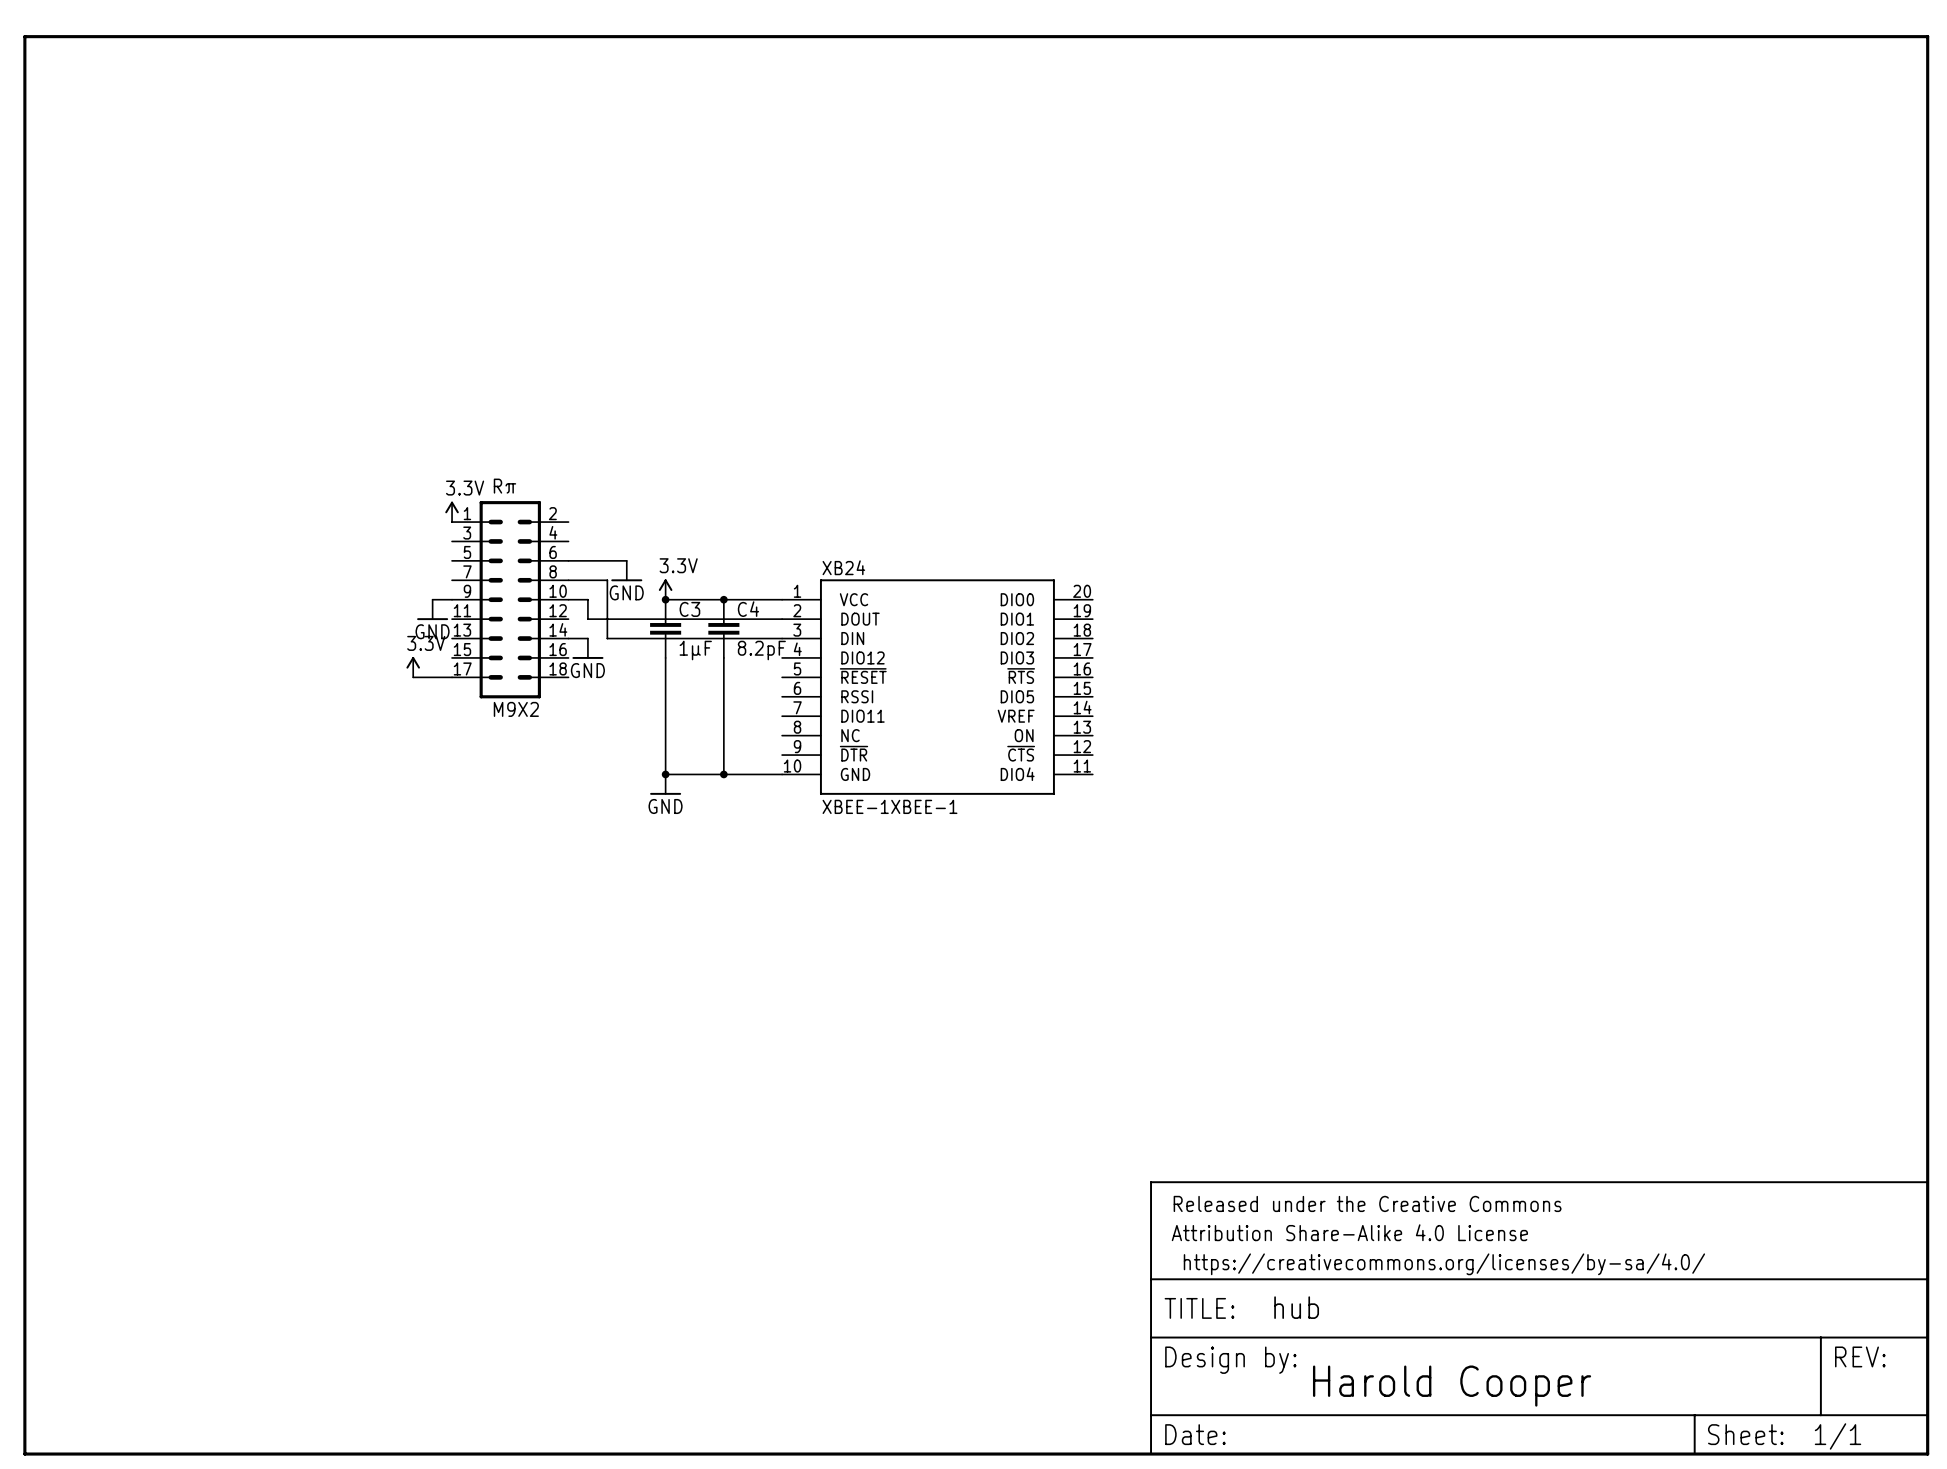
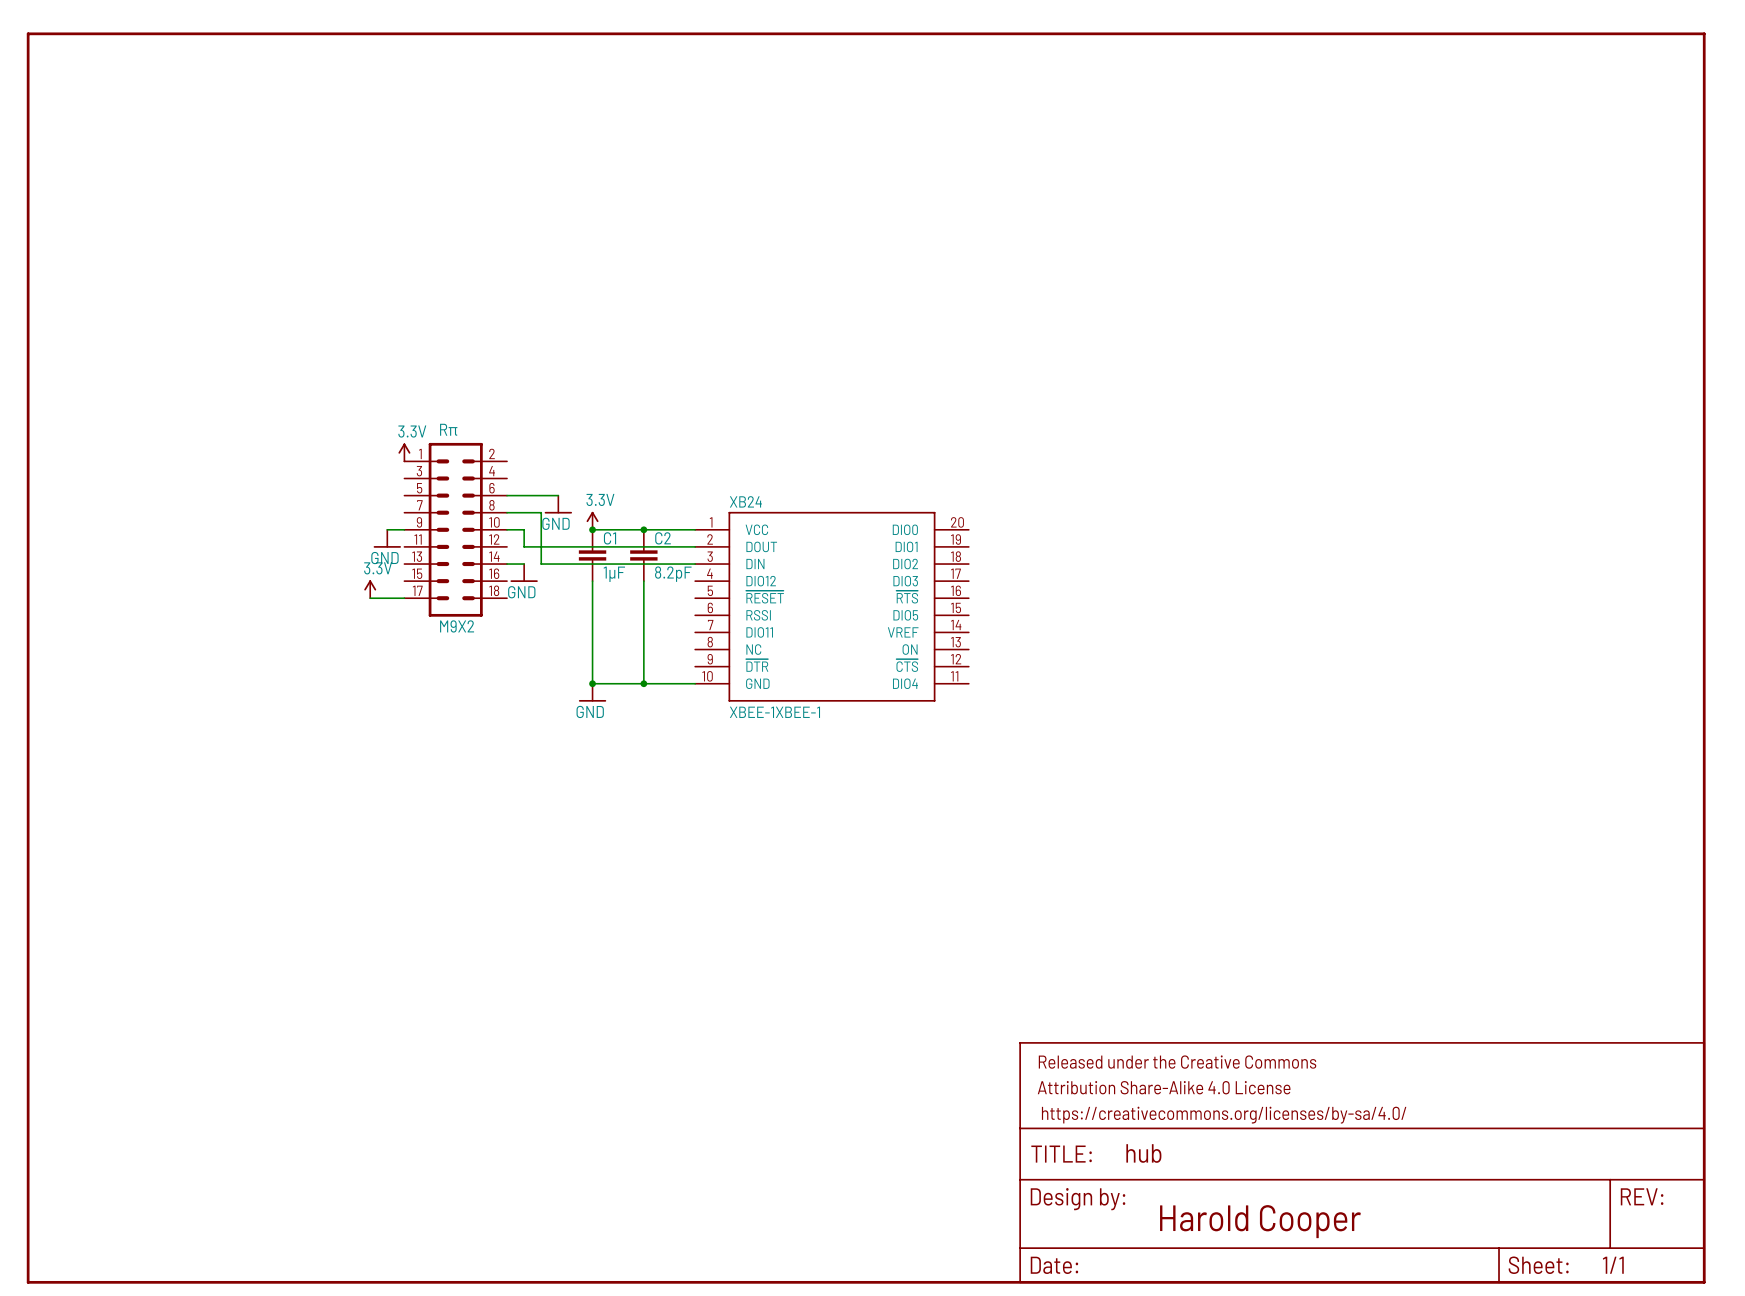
C3 name: C3 (689, 609) -> C1 (610, 538)
C4 name: C4 (748, 609) -> C2 (663, 538)

